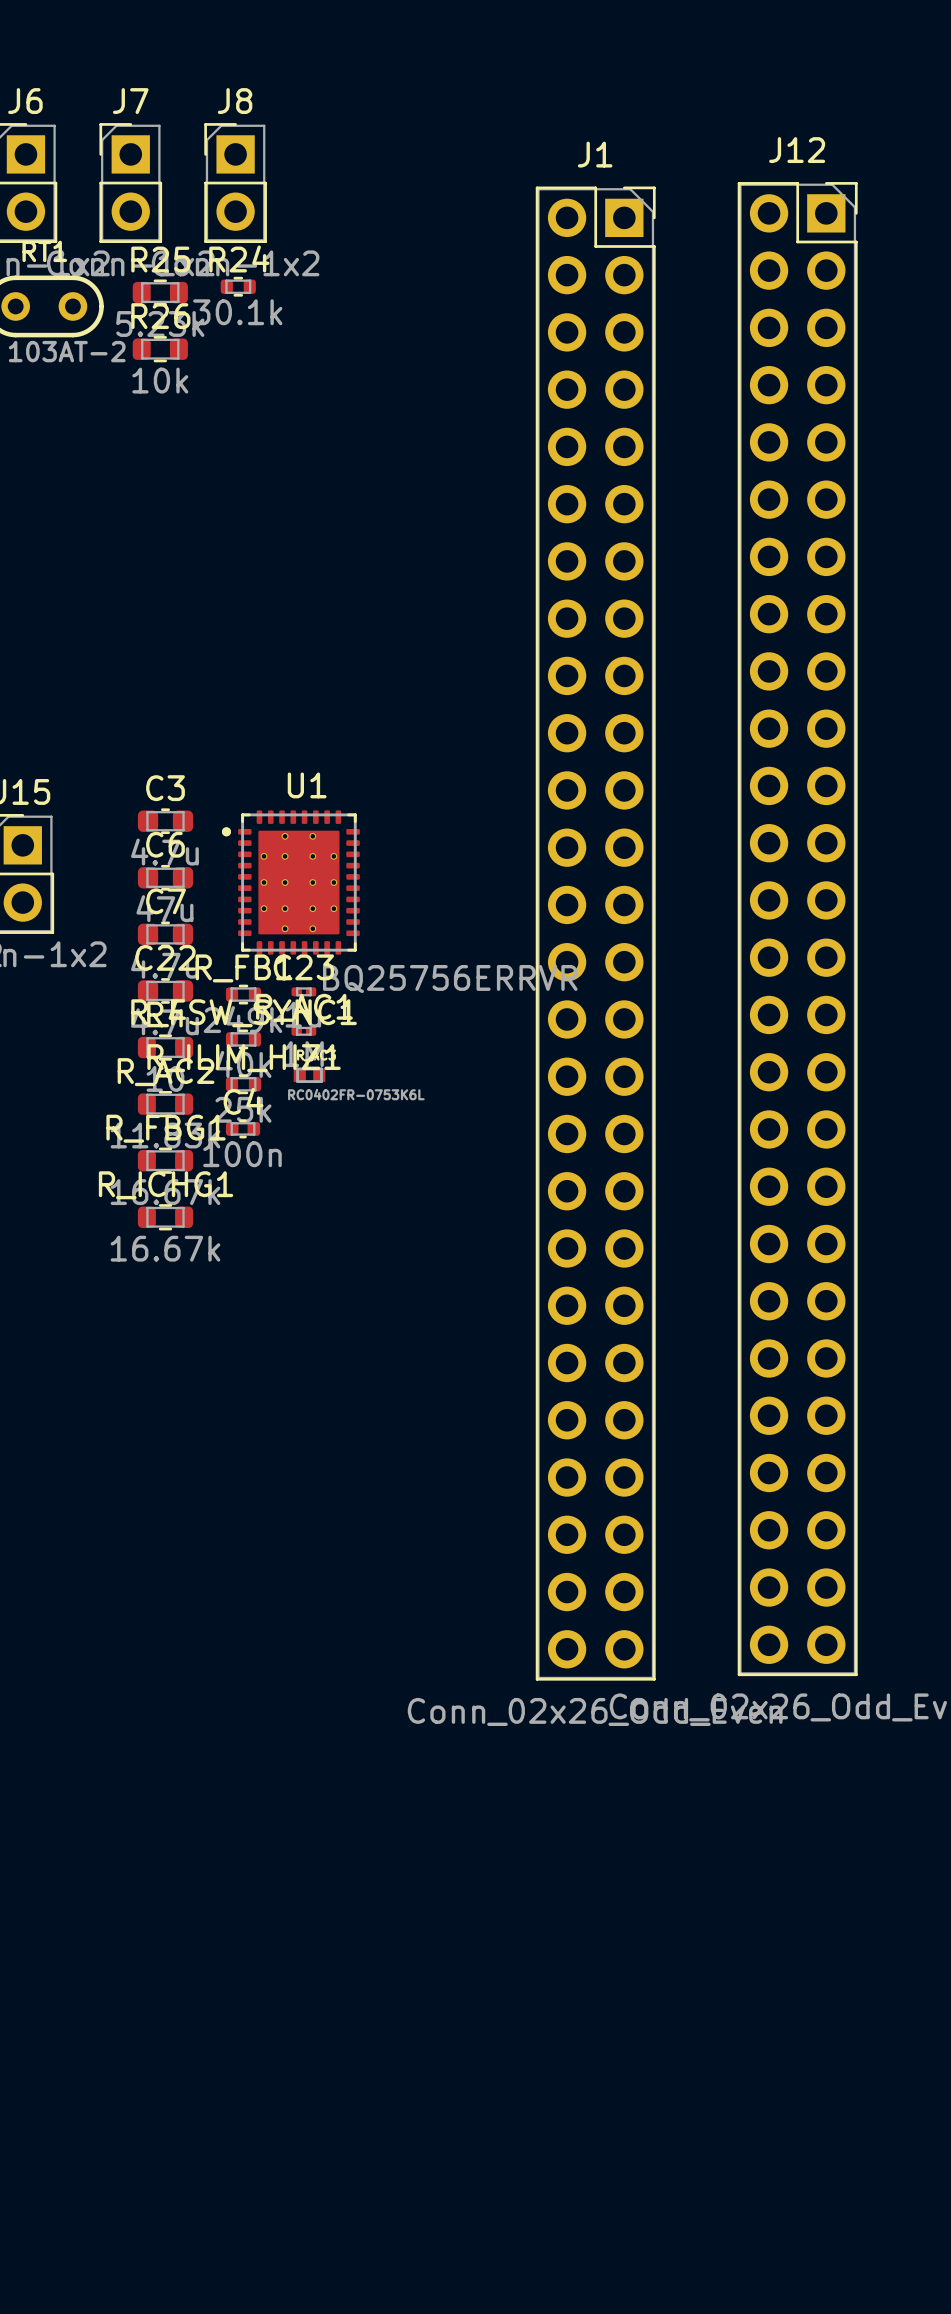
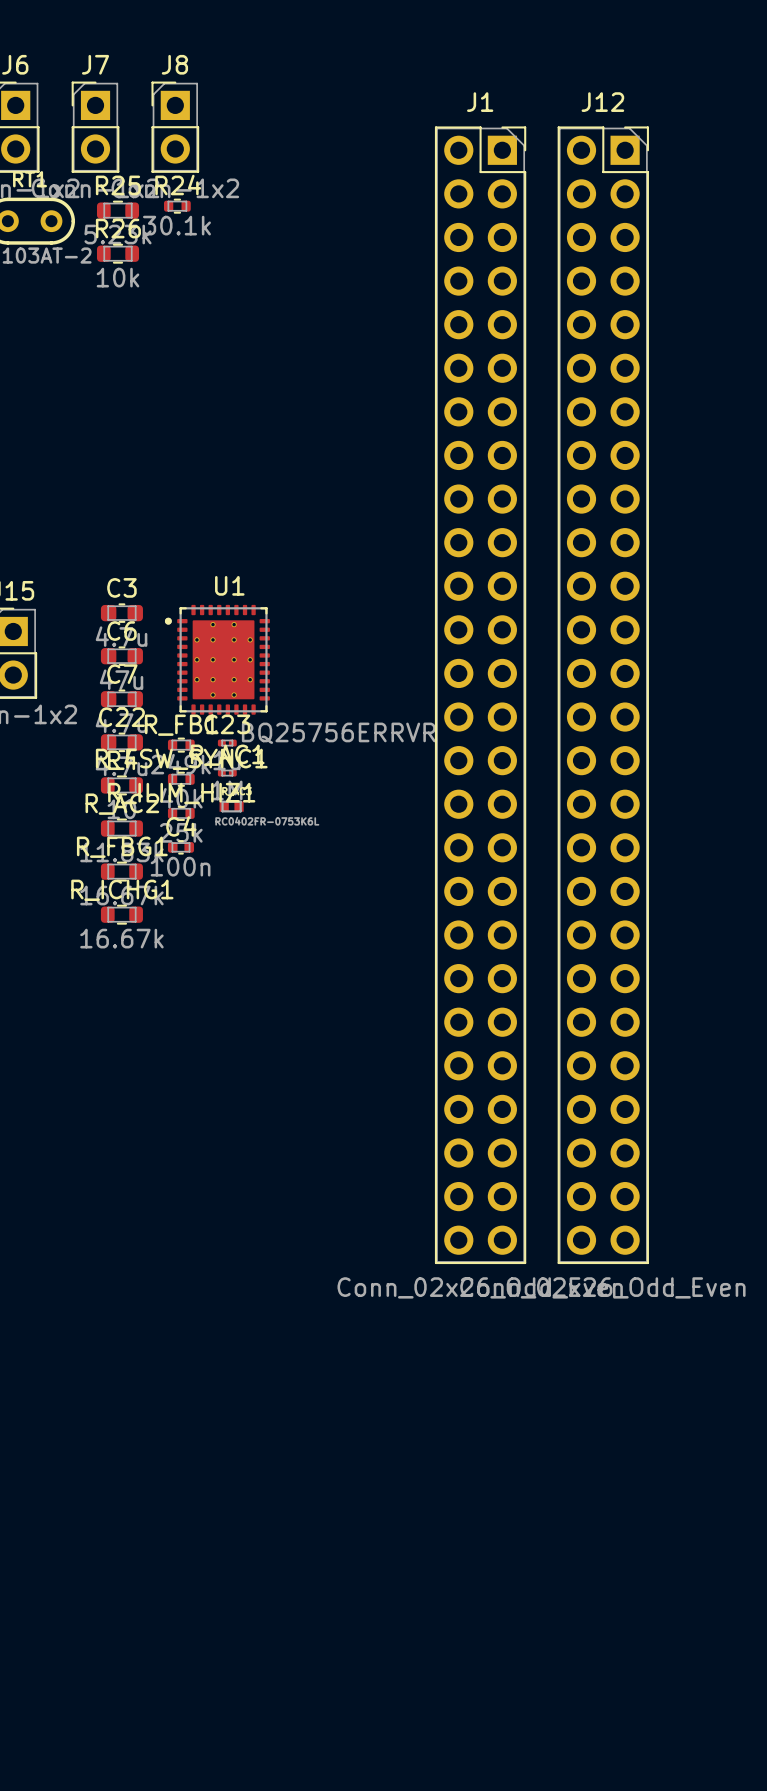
J1 position: (595, 933) -> (480, 695)

